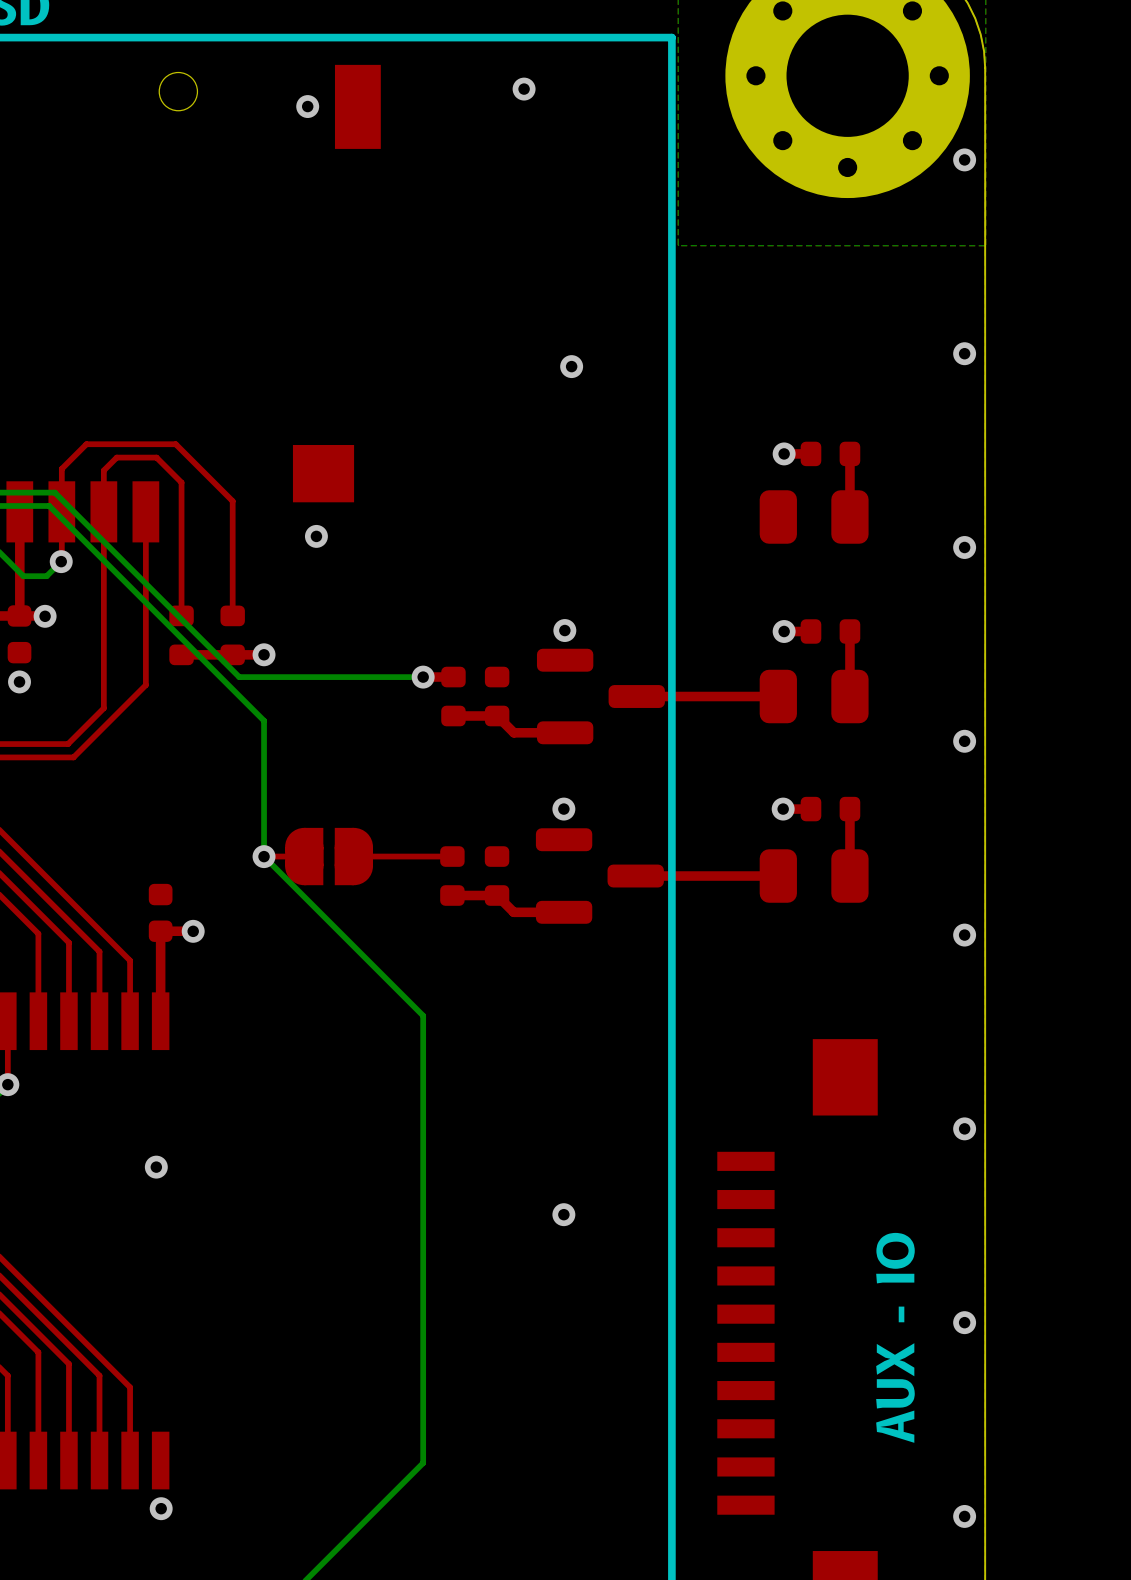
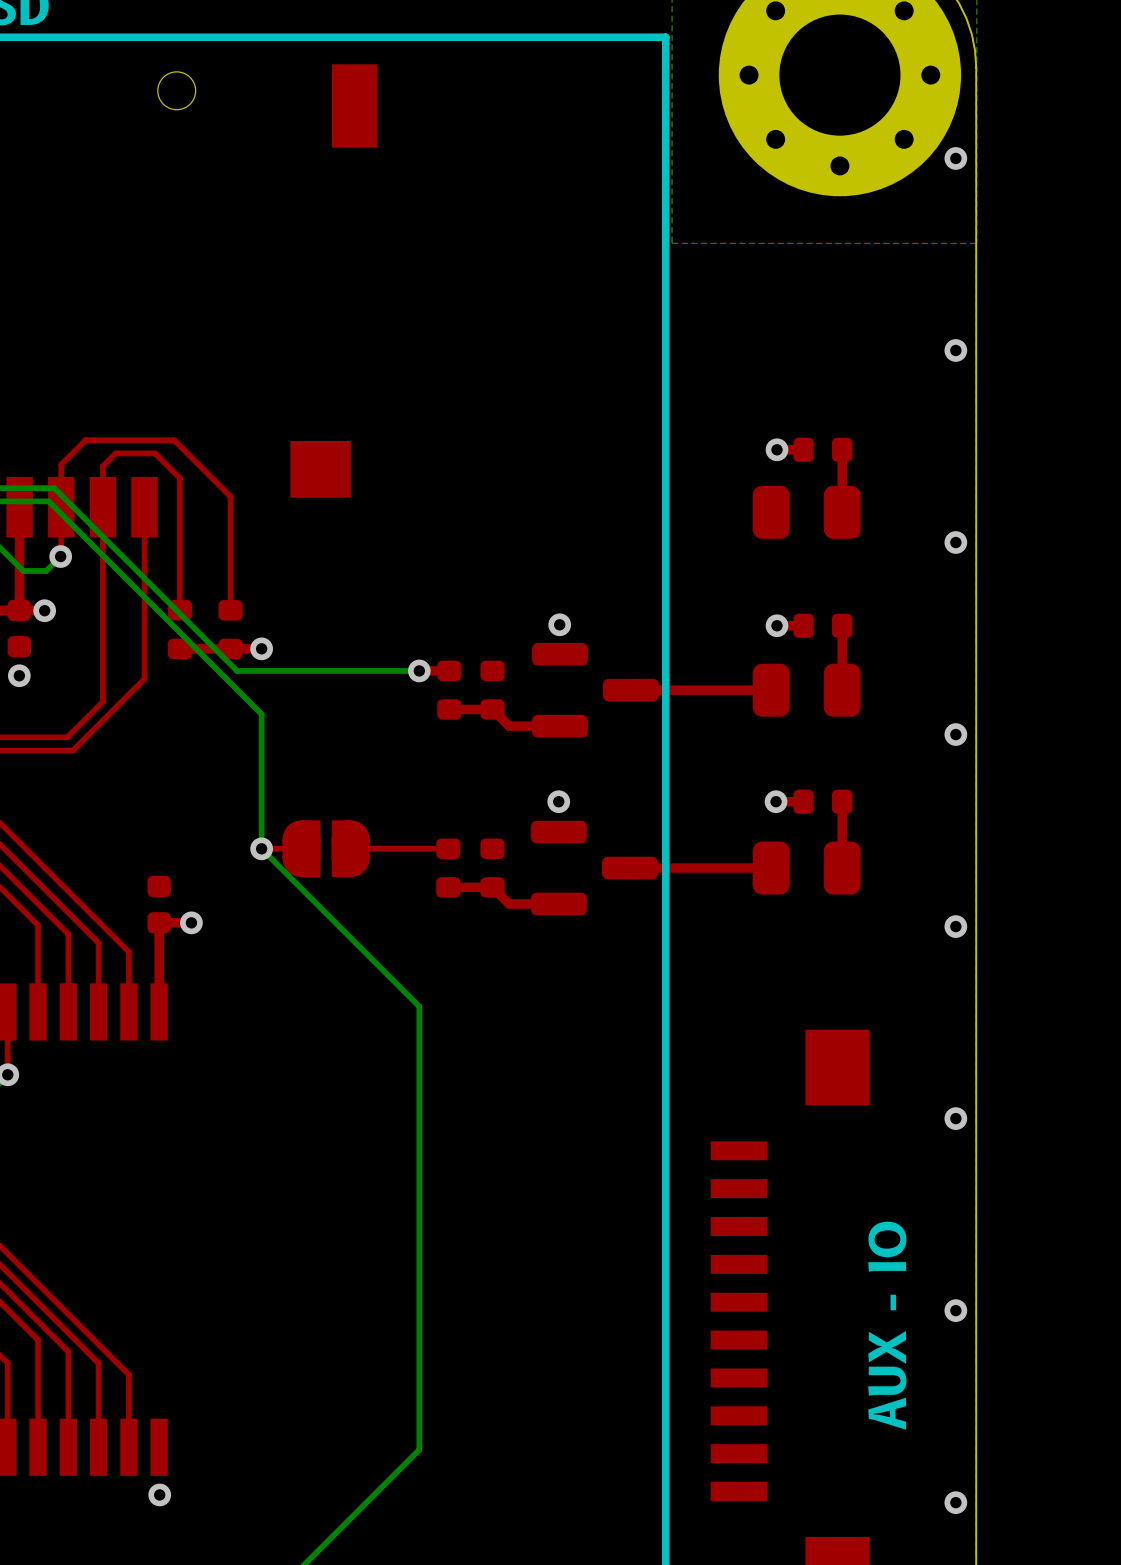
via: (524, 89) -> none
via: (307, 106) -> none
via: (571, 366) -> none
via: (316, 536) -> none
via: (156, 1167) -> none
via: (563, 1214) -> none

